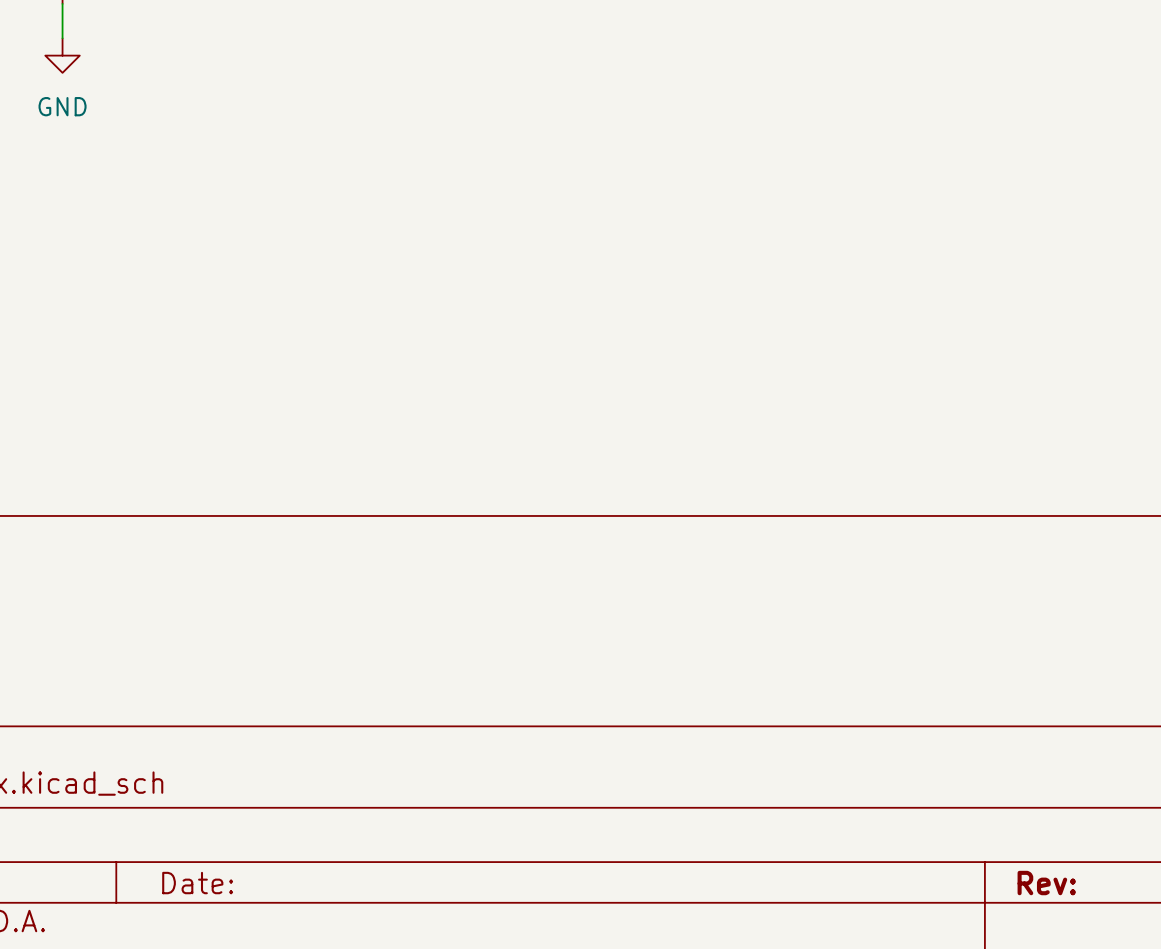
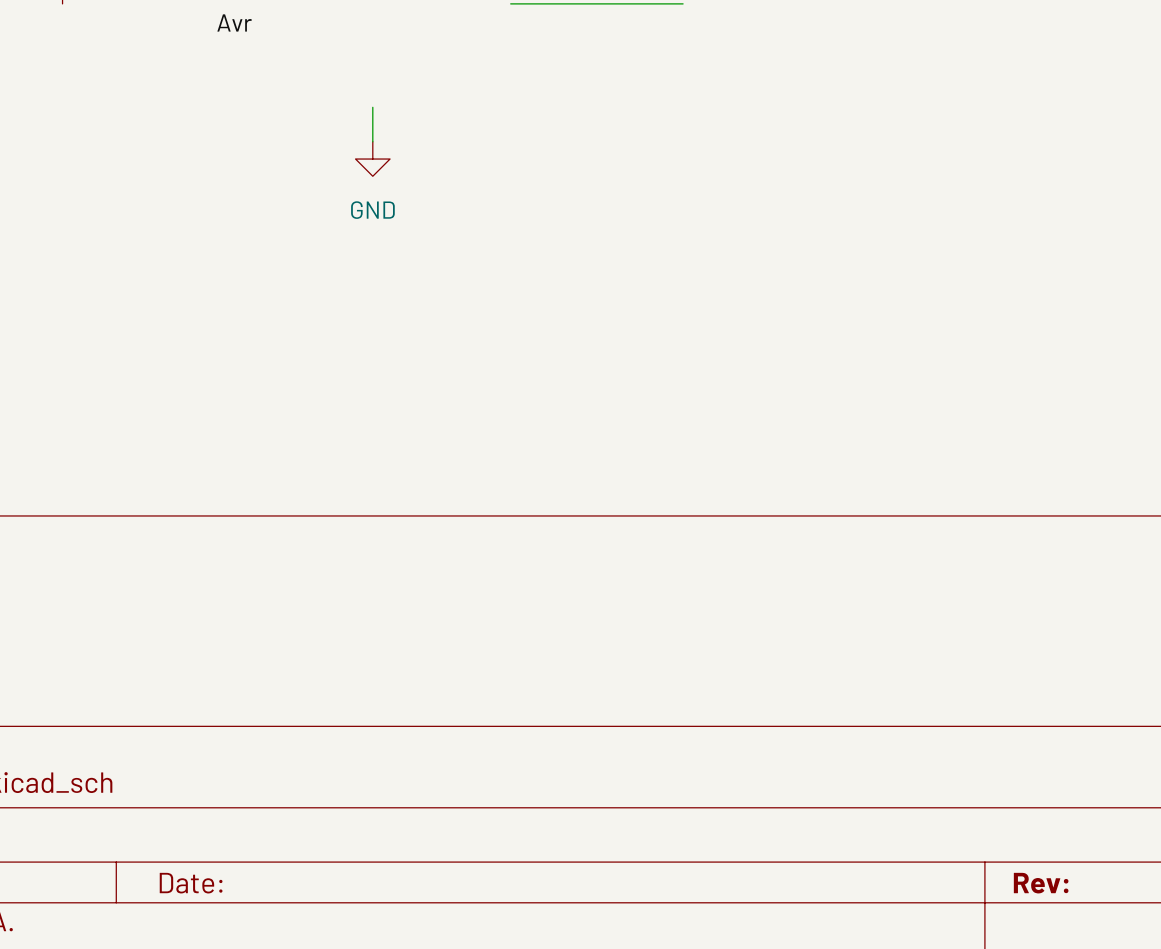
wire: (62, 3) (62, 38) -> (372, 107) (372, 141)
wire: none -> (510, 3) (683, 3)
label: none -> Avr (234, 22)
power symbol: GND (62, 55) -> none
power symbol: none -> GND (372, 159)

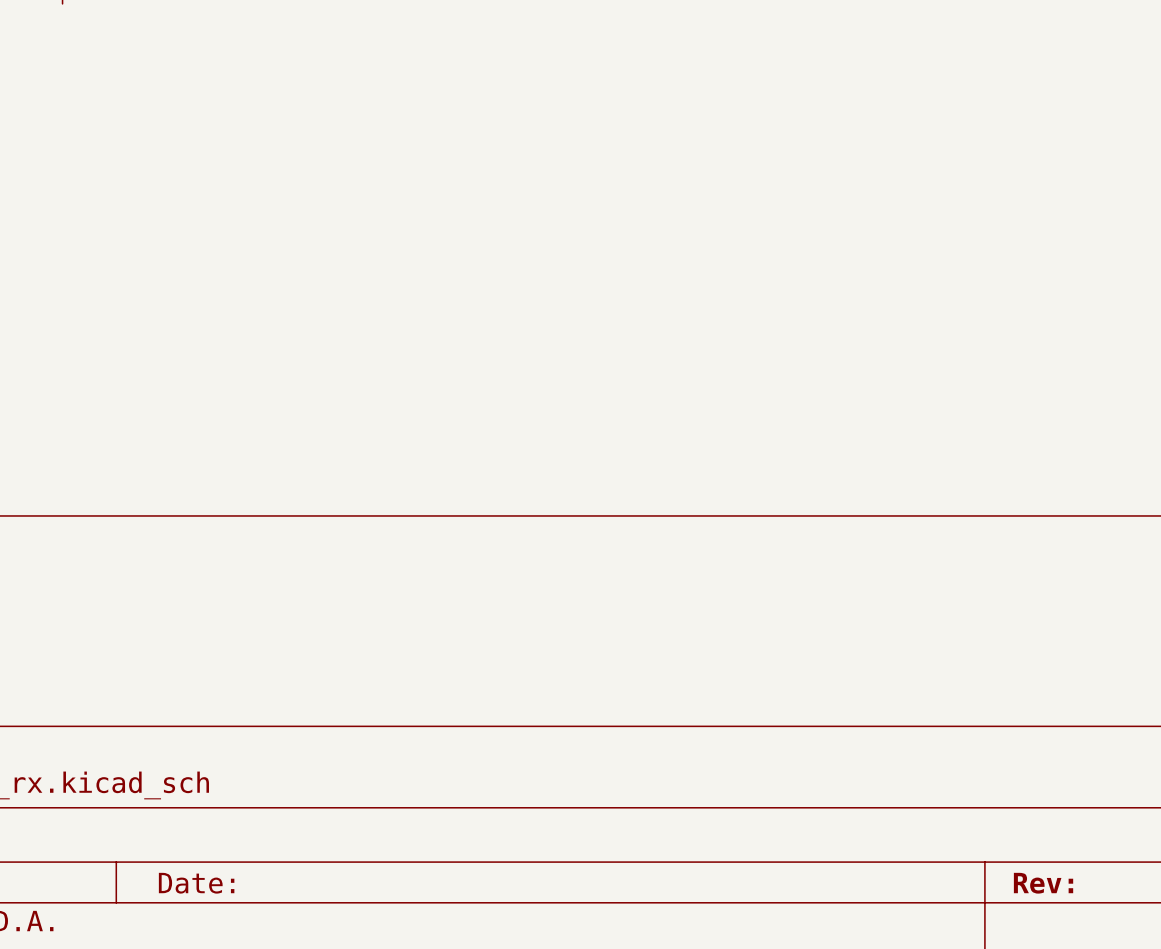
wire: (510, 3) (683, 3) -> none
label: Avr (234, 22) -> none
wire: (372, 107) (372, 141) -> none
power symbol: GND (372, 159) -> none

